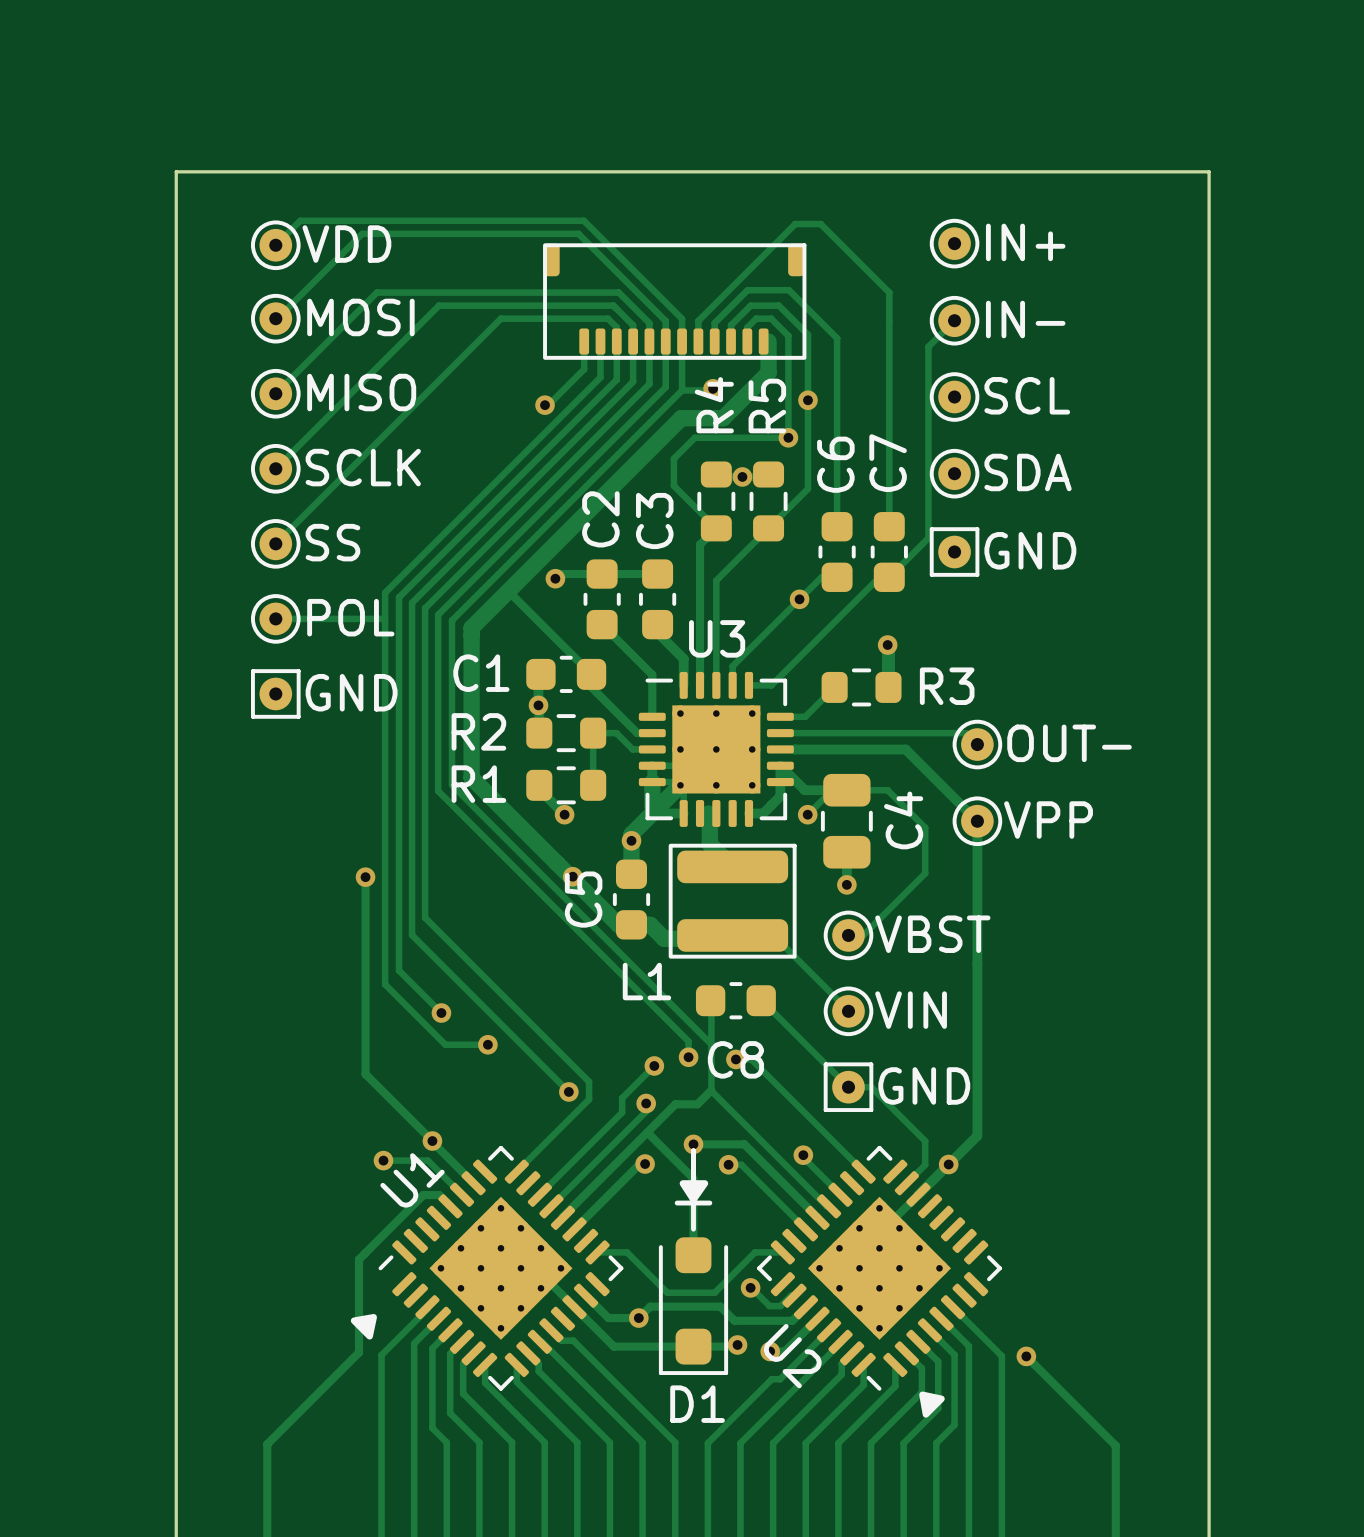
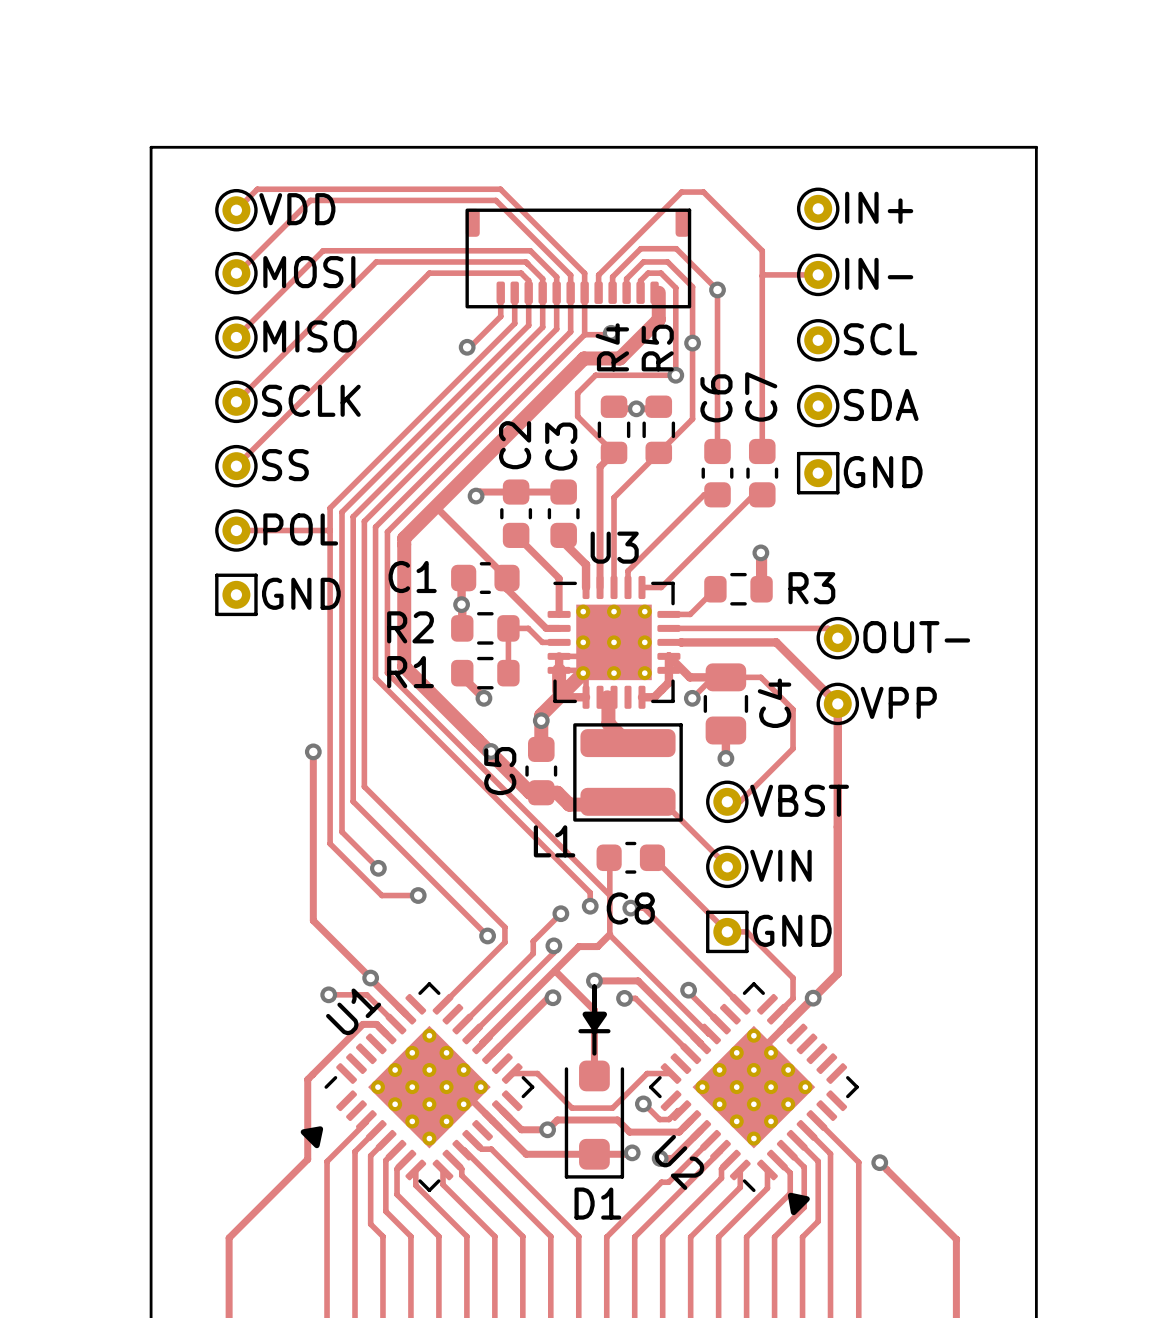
track: (954, 320) (928, 346) (928, 538) (889, 577) -> (818, 274) (762, 275)
via: none -> (717, 289)
via: (799, 599) -> none

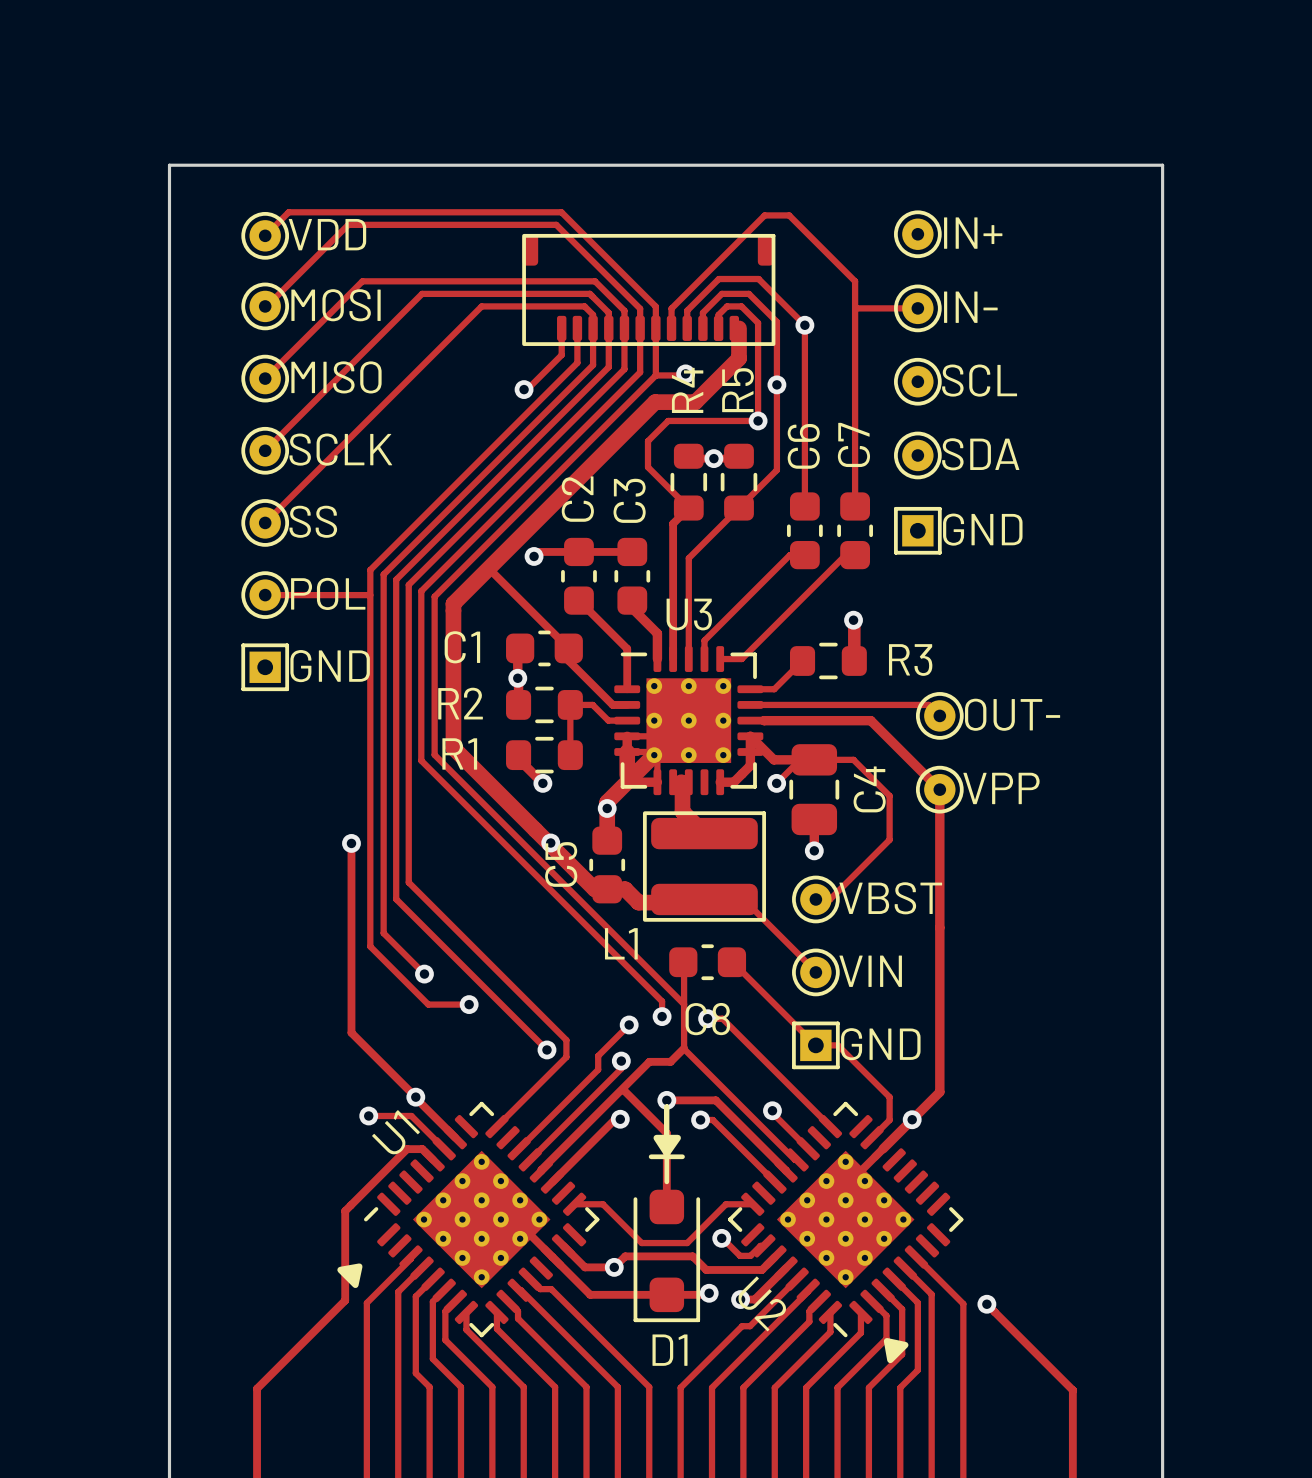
part footprint: [796, 451, 840, 495] -> [894, 506, 942, 555]
part footprint: [215, 573, 258, 617] -> [241, 643, 290, 692]
part footprint: [706, 910, 749, 954] -> [792, 1021, 840, 1070]

